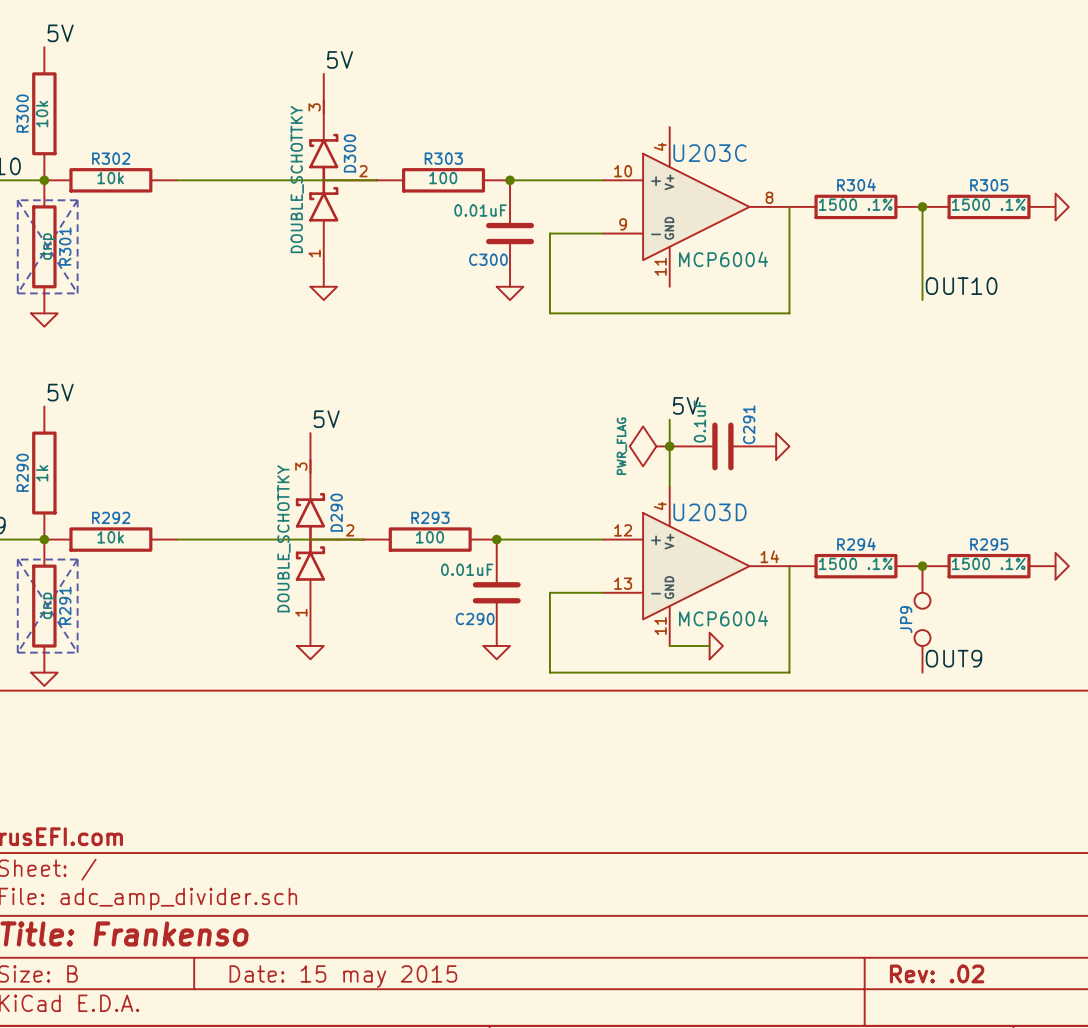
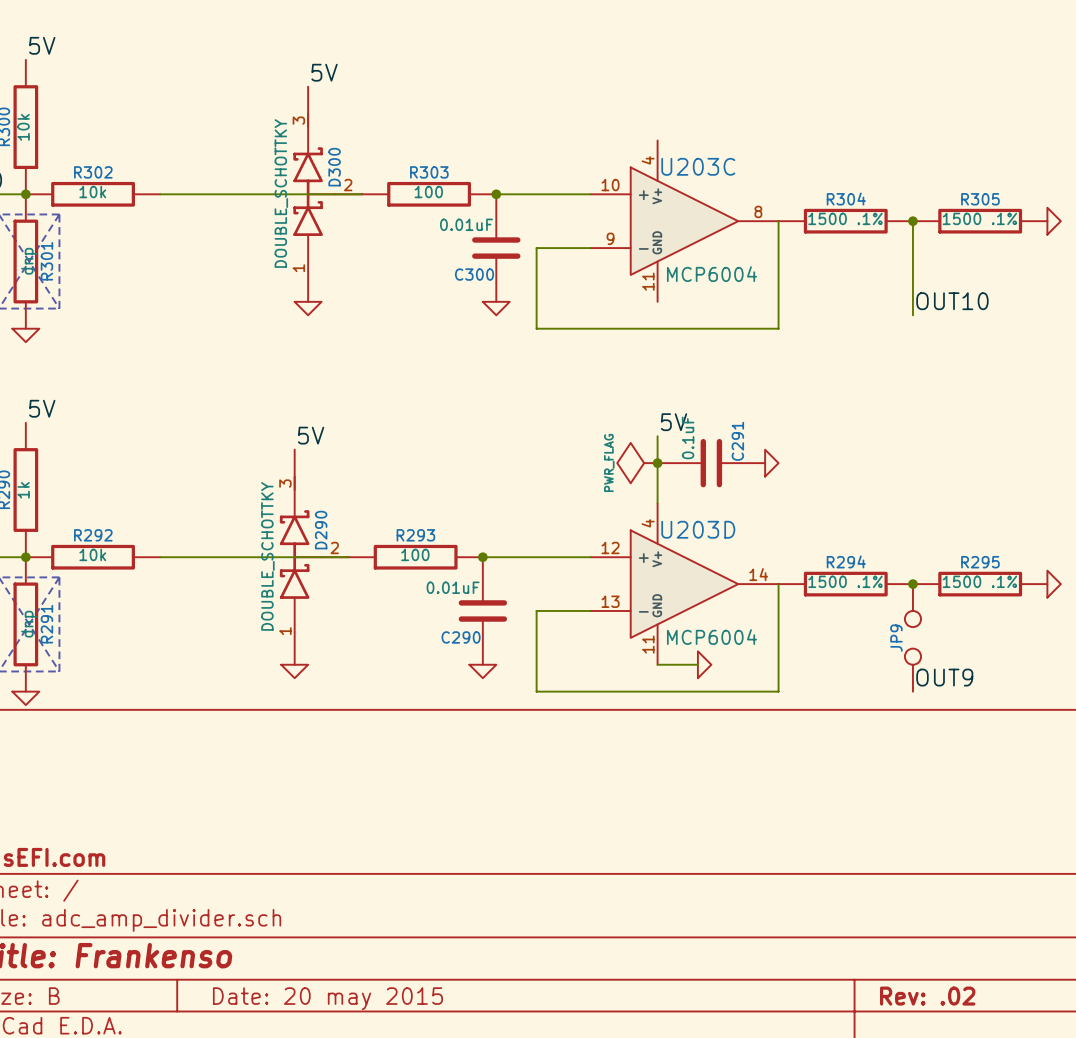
title block: Date: 15 may 2015 (343, 976) -> Date: 20 may 2015 (327, 998)

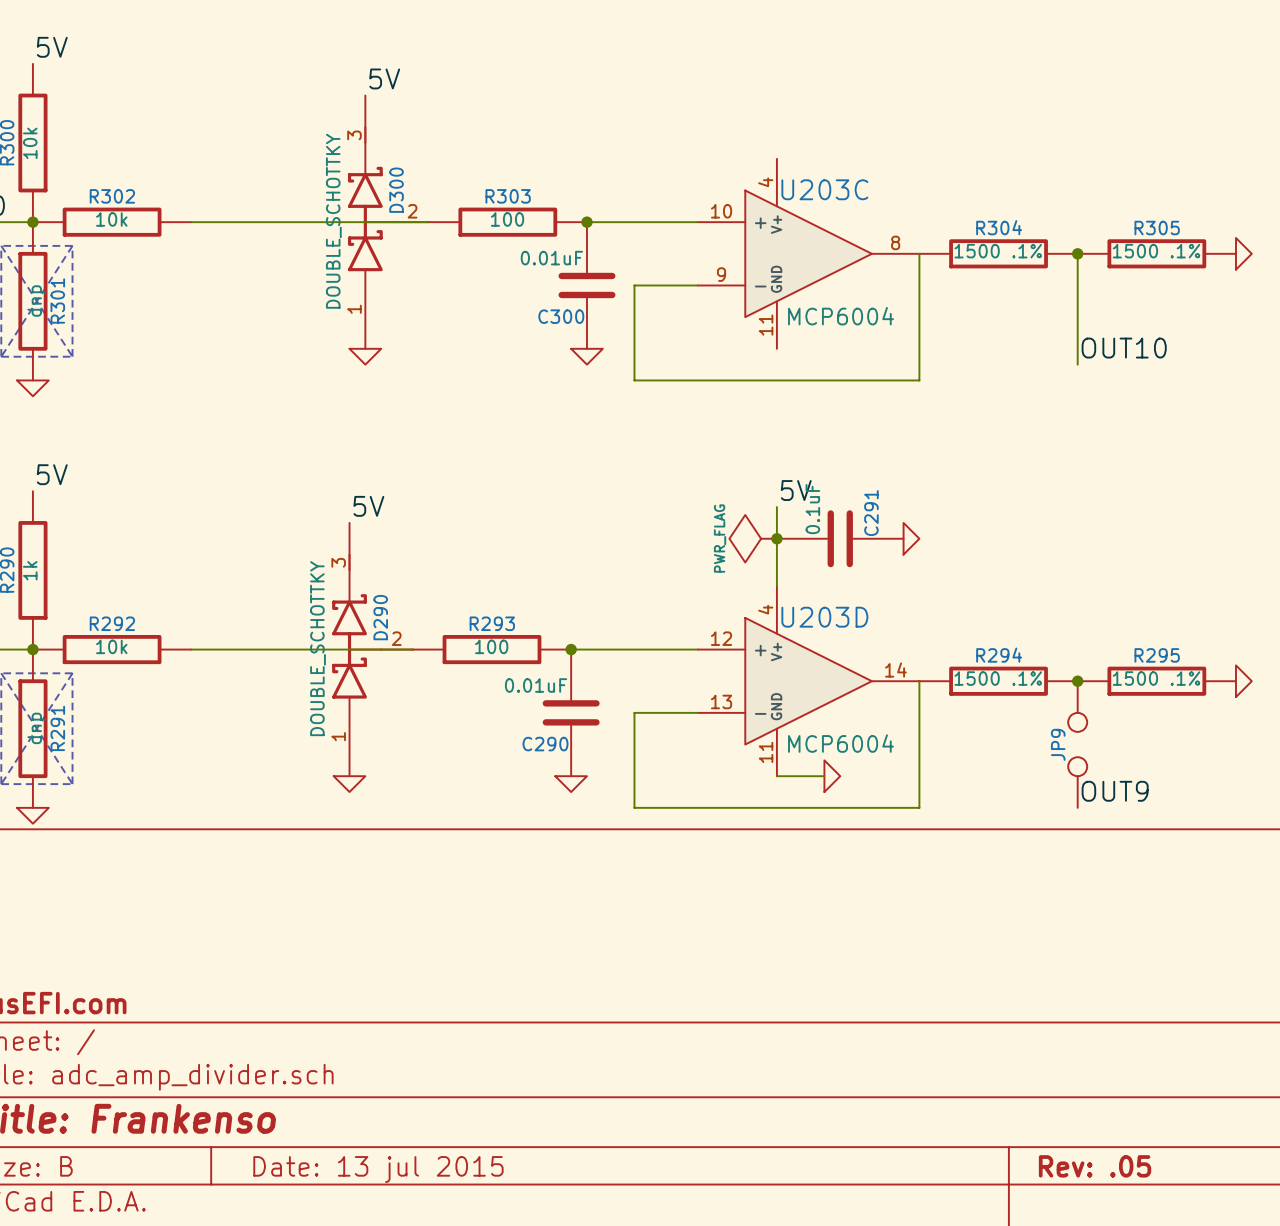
title block: Rev: .02 (927, 996) -> Rev: .05 (1095, 1166)
title block: Date: 20 may 2015 (327, 998) -> Date: 13 jul 2015 (378, 1169)

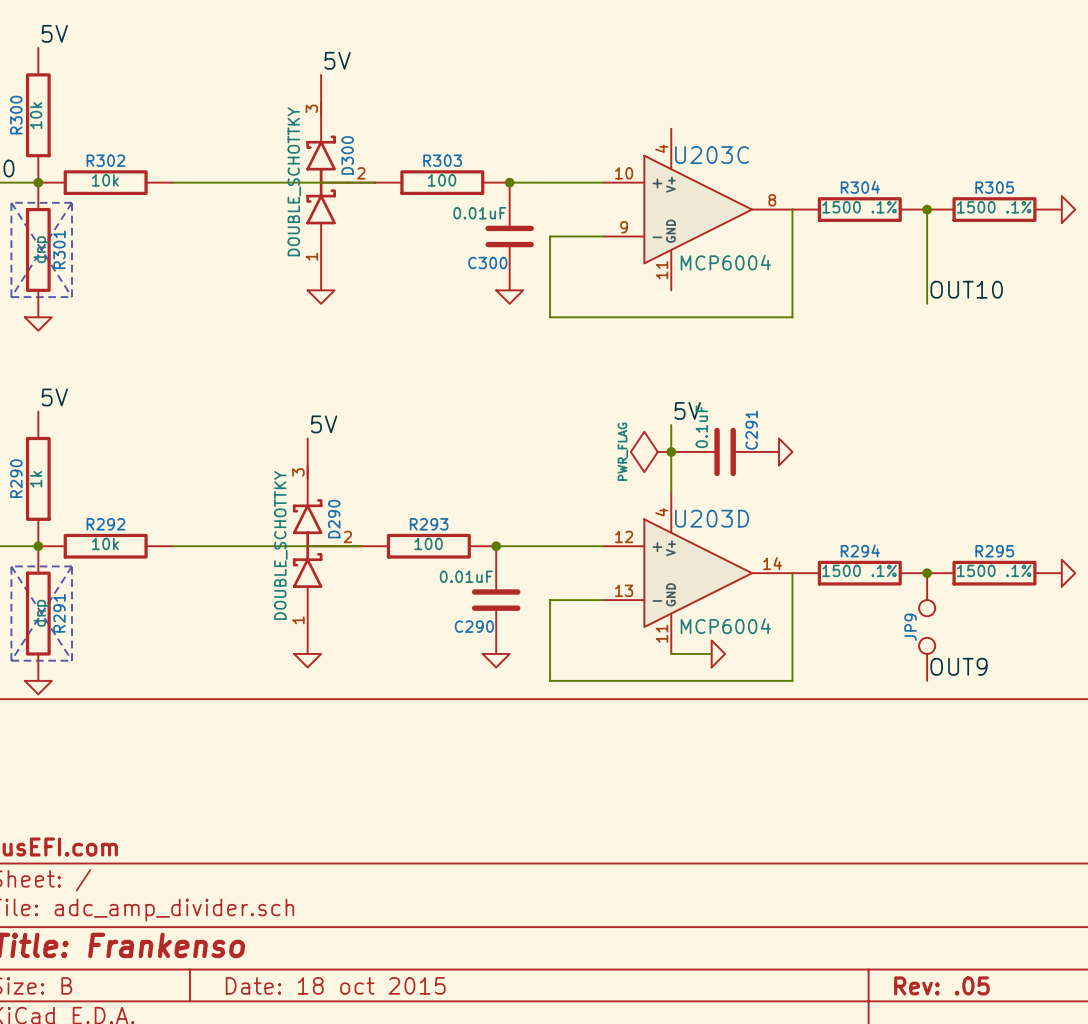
title block: Date: 13 jul 2015 (378, 1169) -> Date: 18 oct 2015 (335, 985)

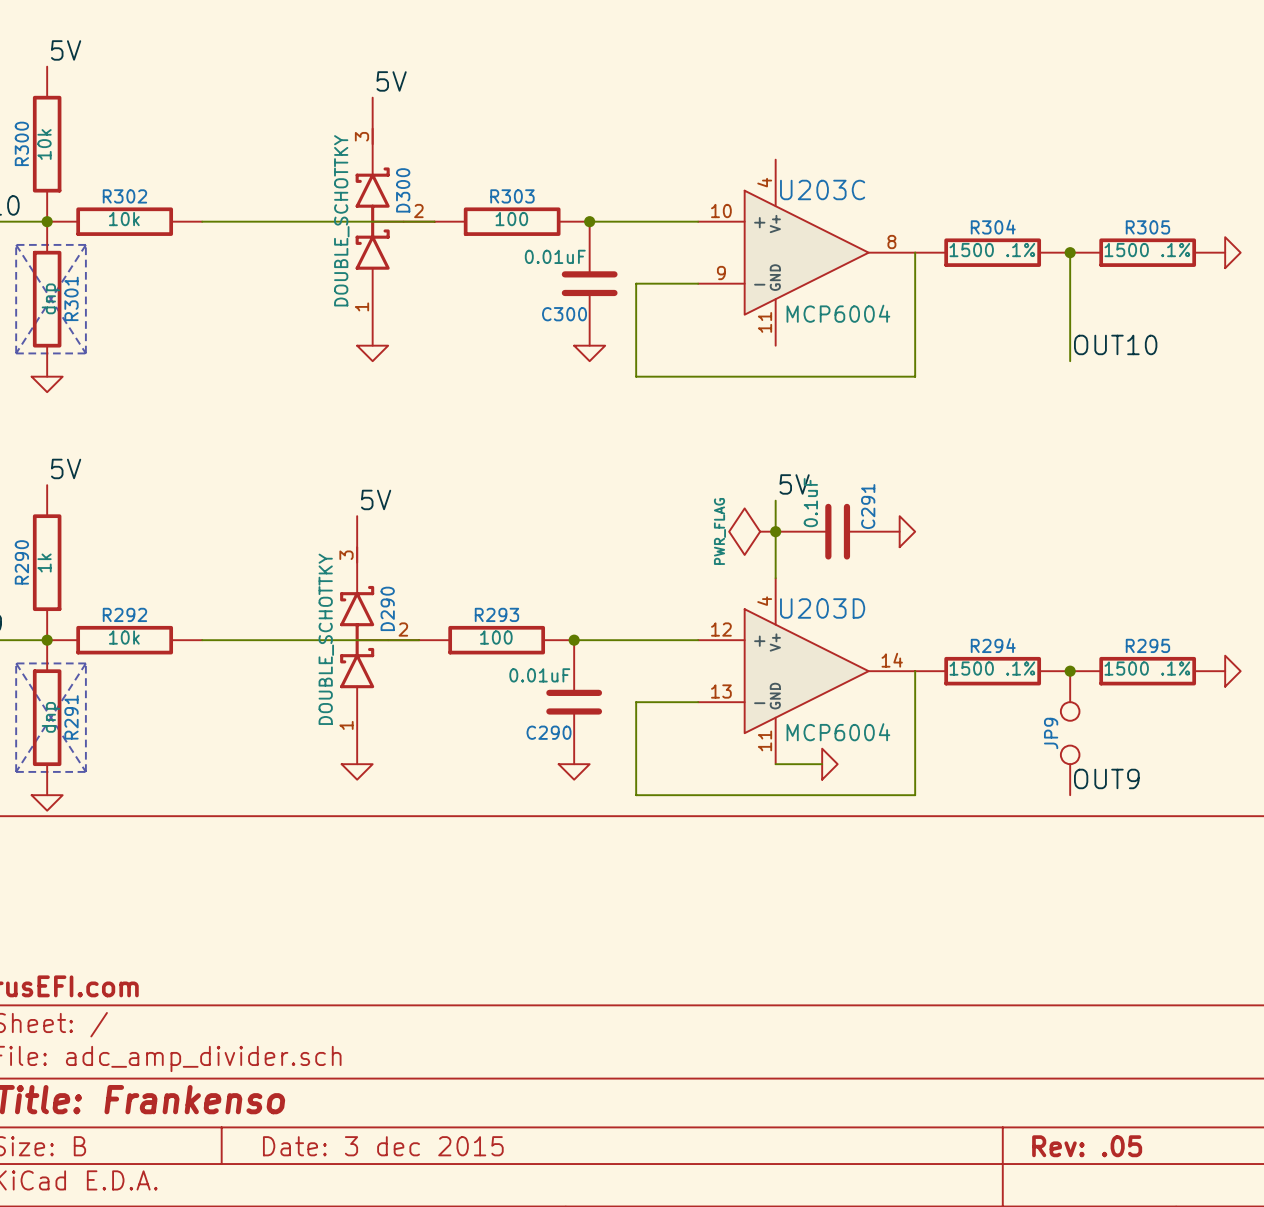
title block: Date: 18 oct 2015 (335, 985) -> Date: 3 dec 2015 (383, 1146)

